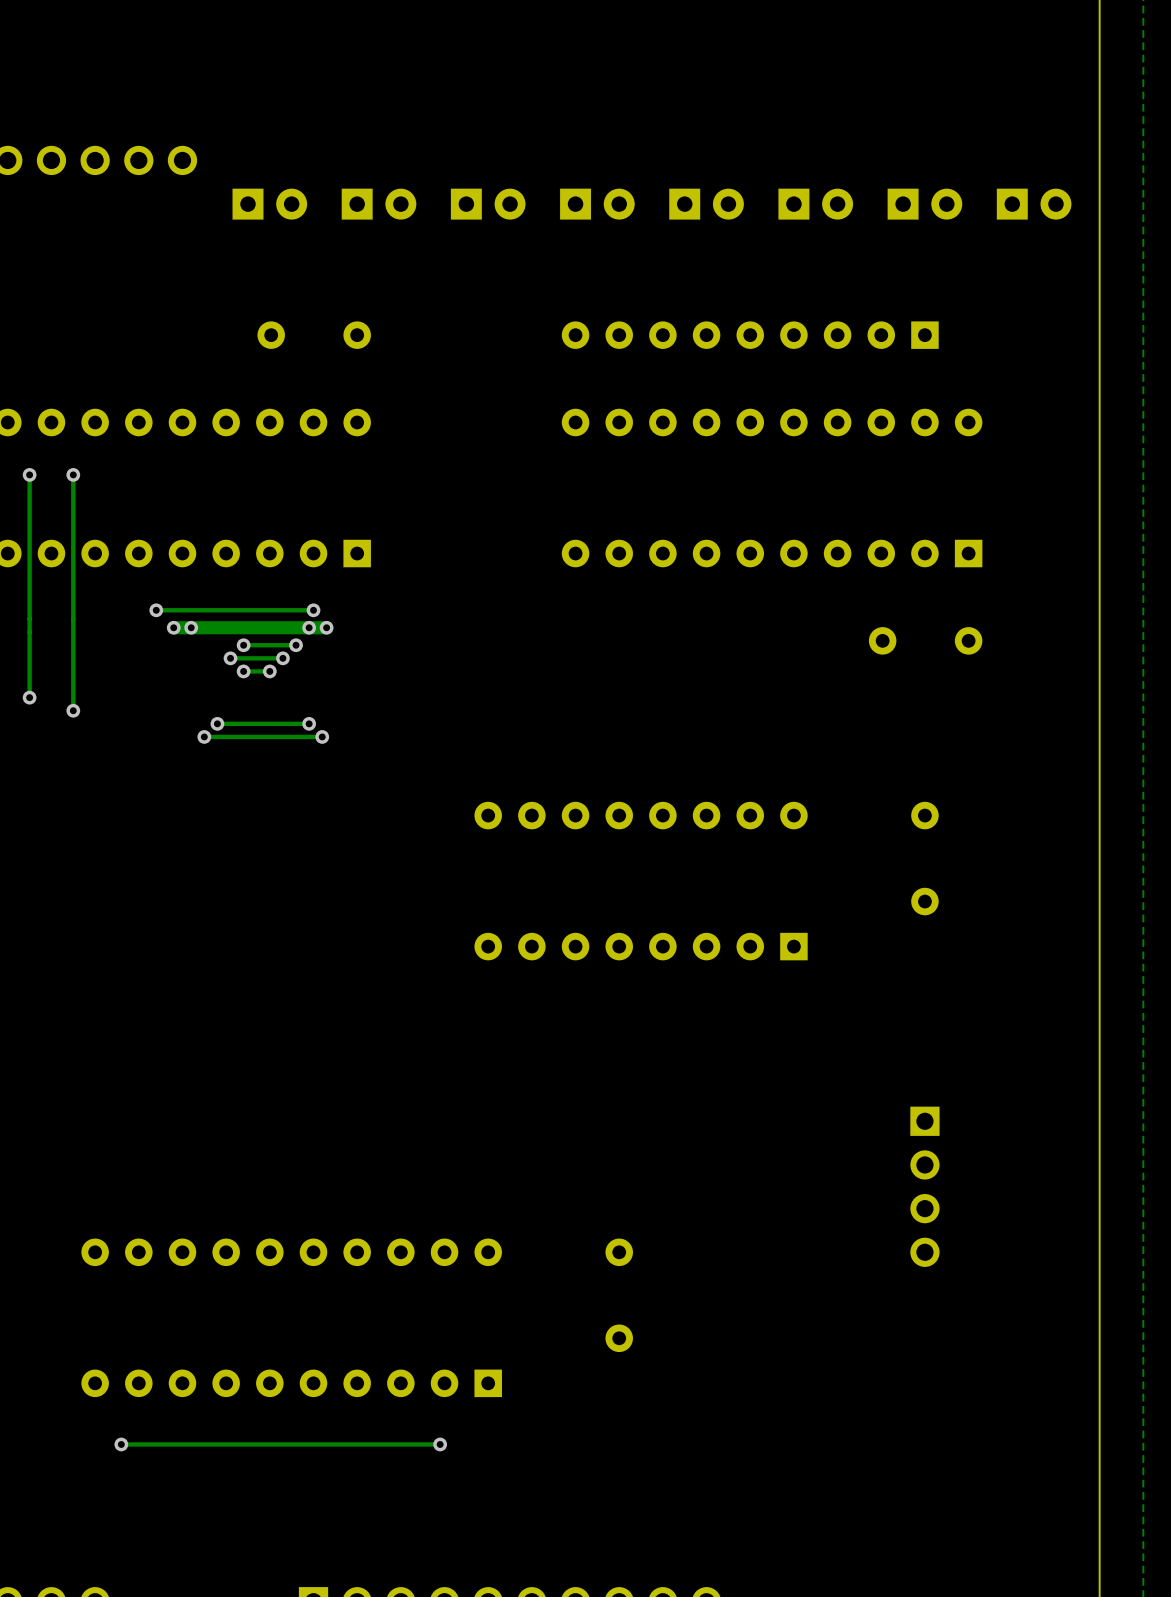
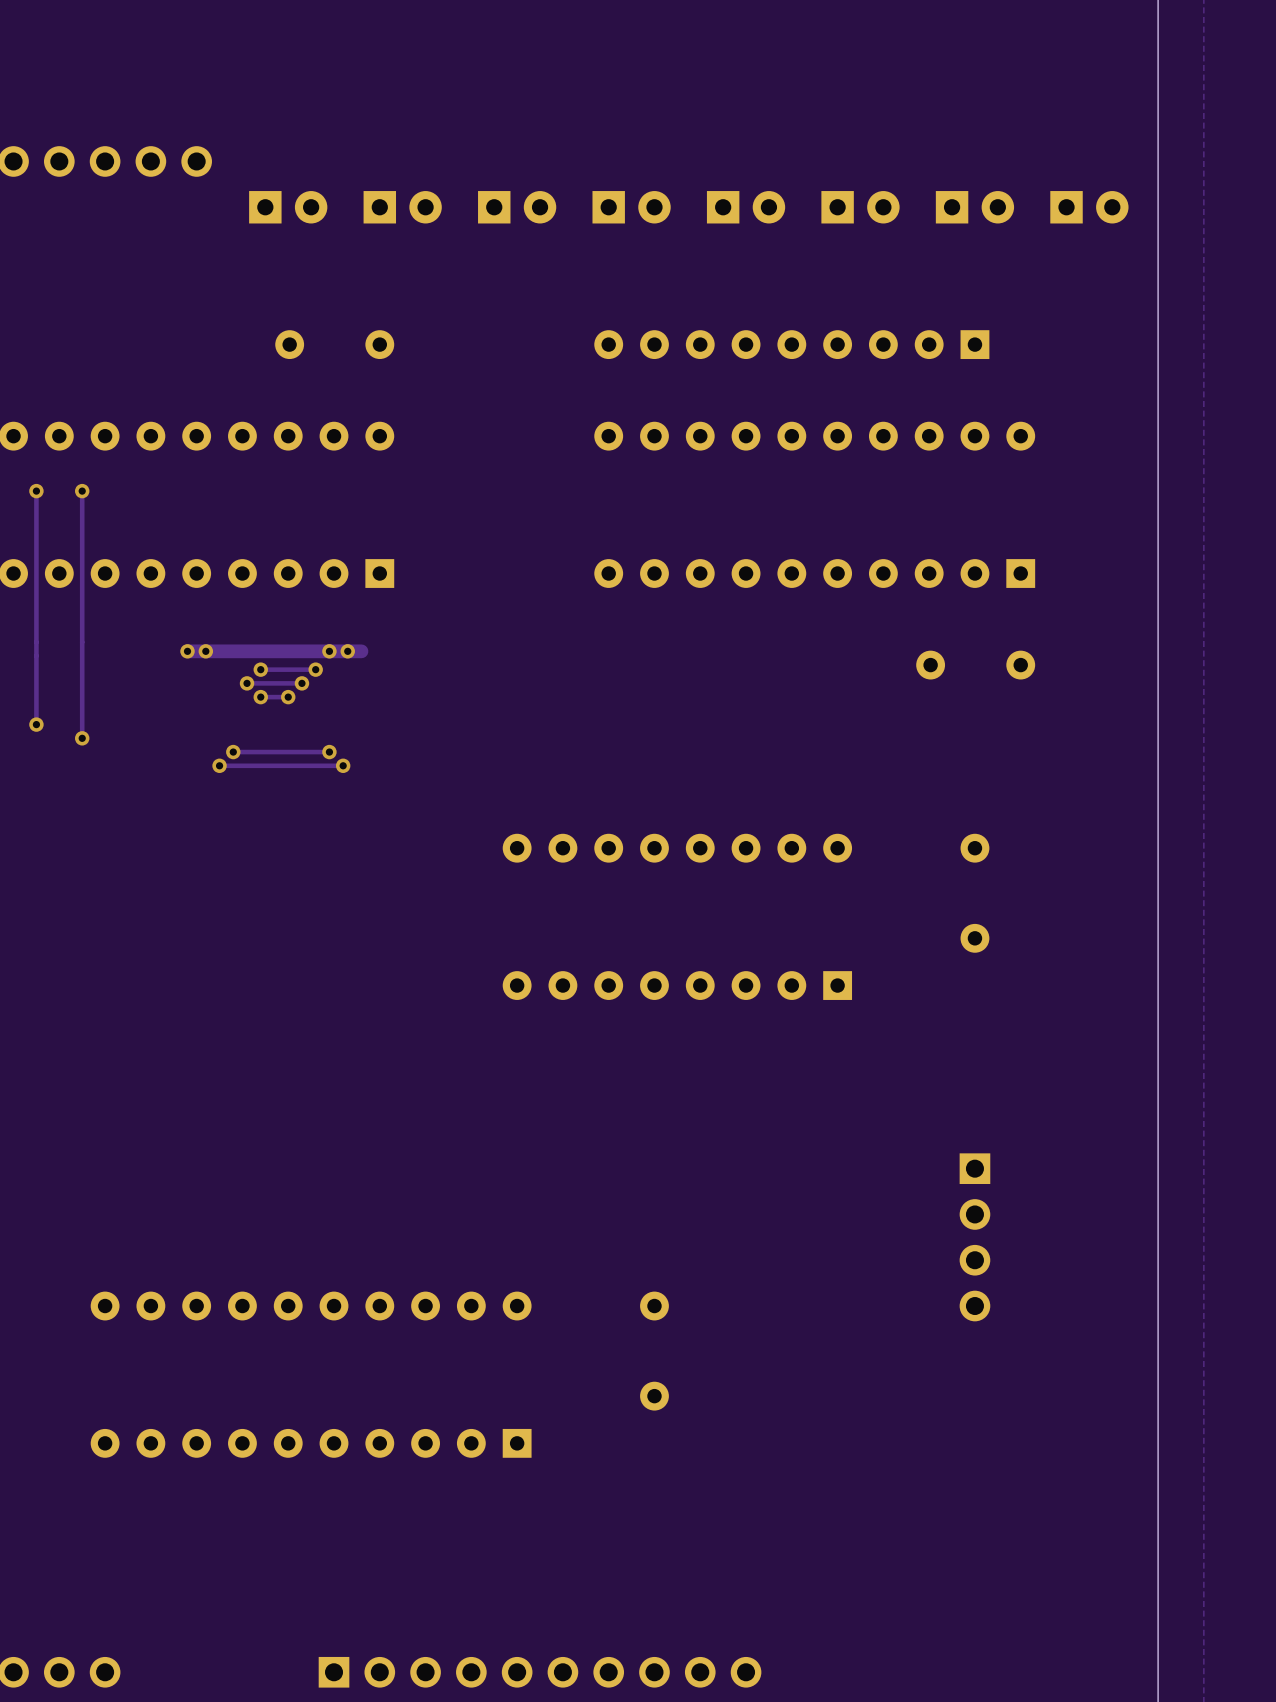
via: (156, 610) -> none
track: (313, 610) (156, 610) -> none
via: (313, 610) -> none
track: none -> (361, 651) (347, 651)
via: (121, 1444) -> none
track: (440, 1444) (121, 1444) -> none
via: (440, 1444) -> none

